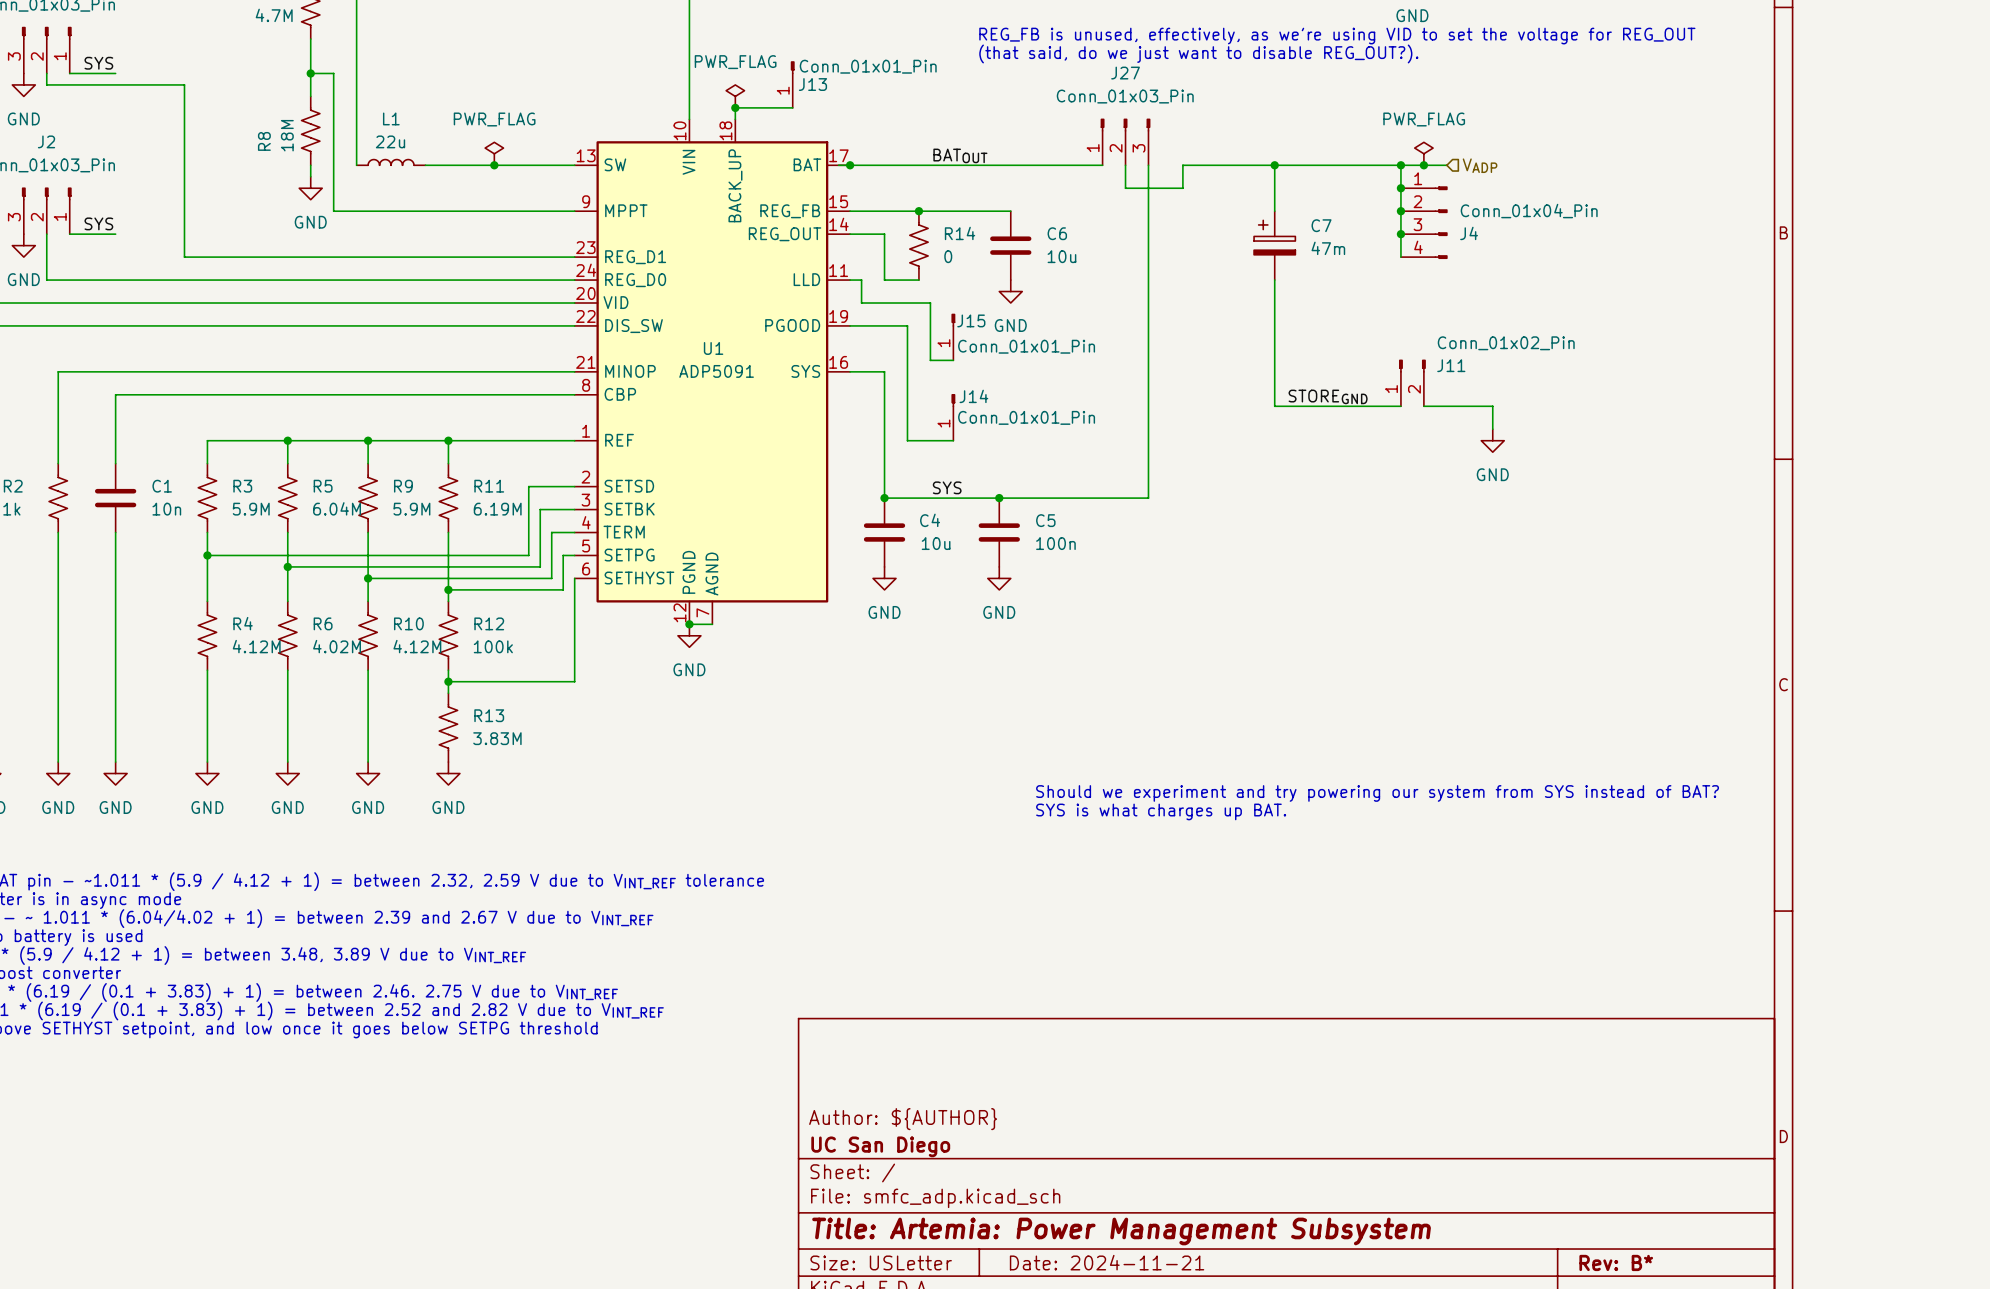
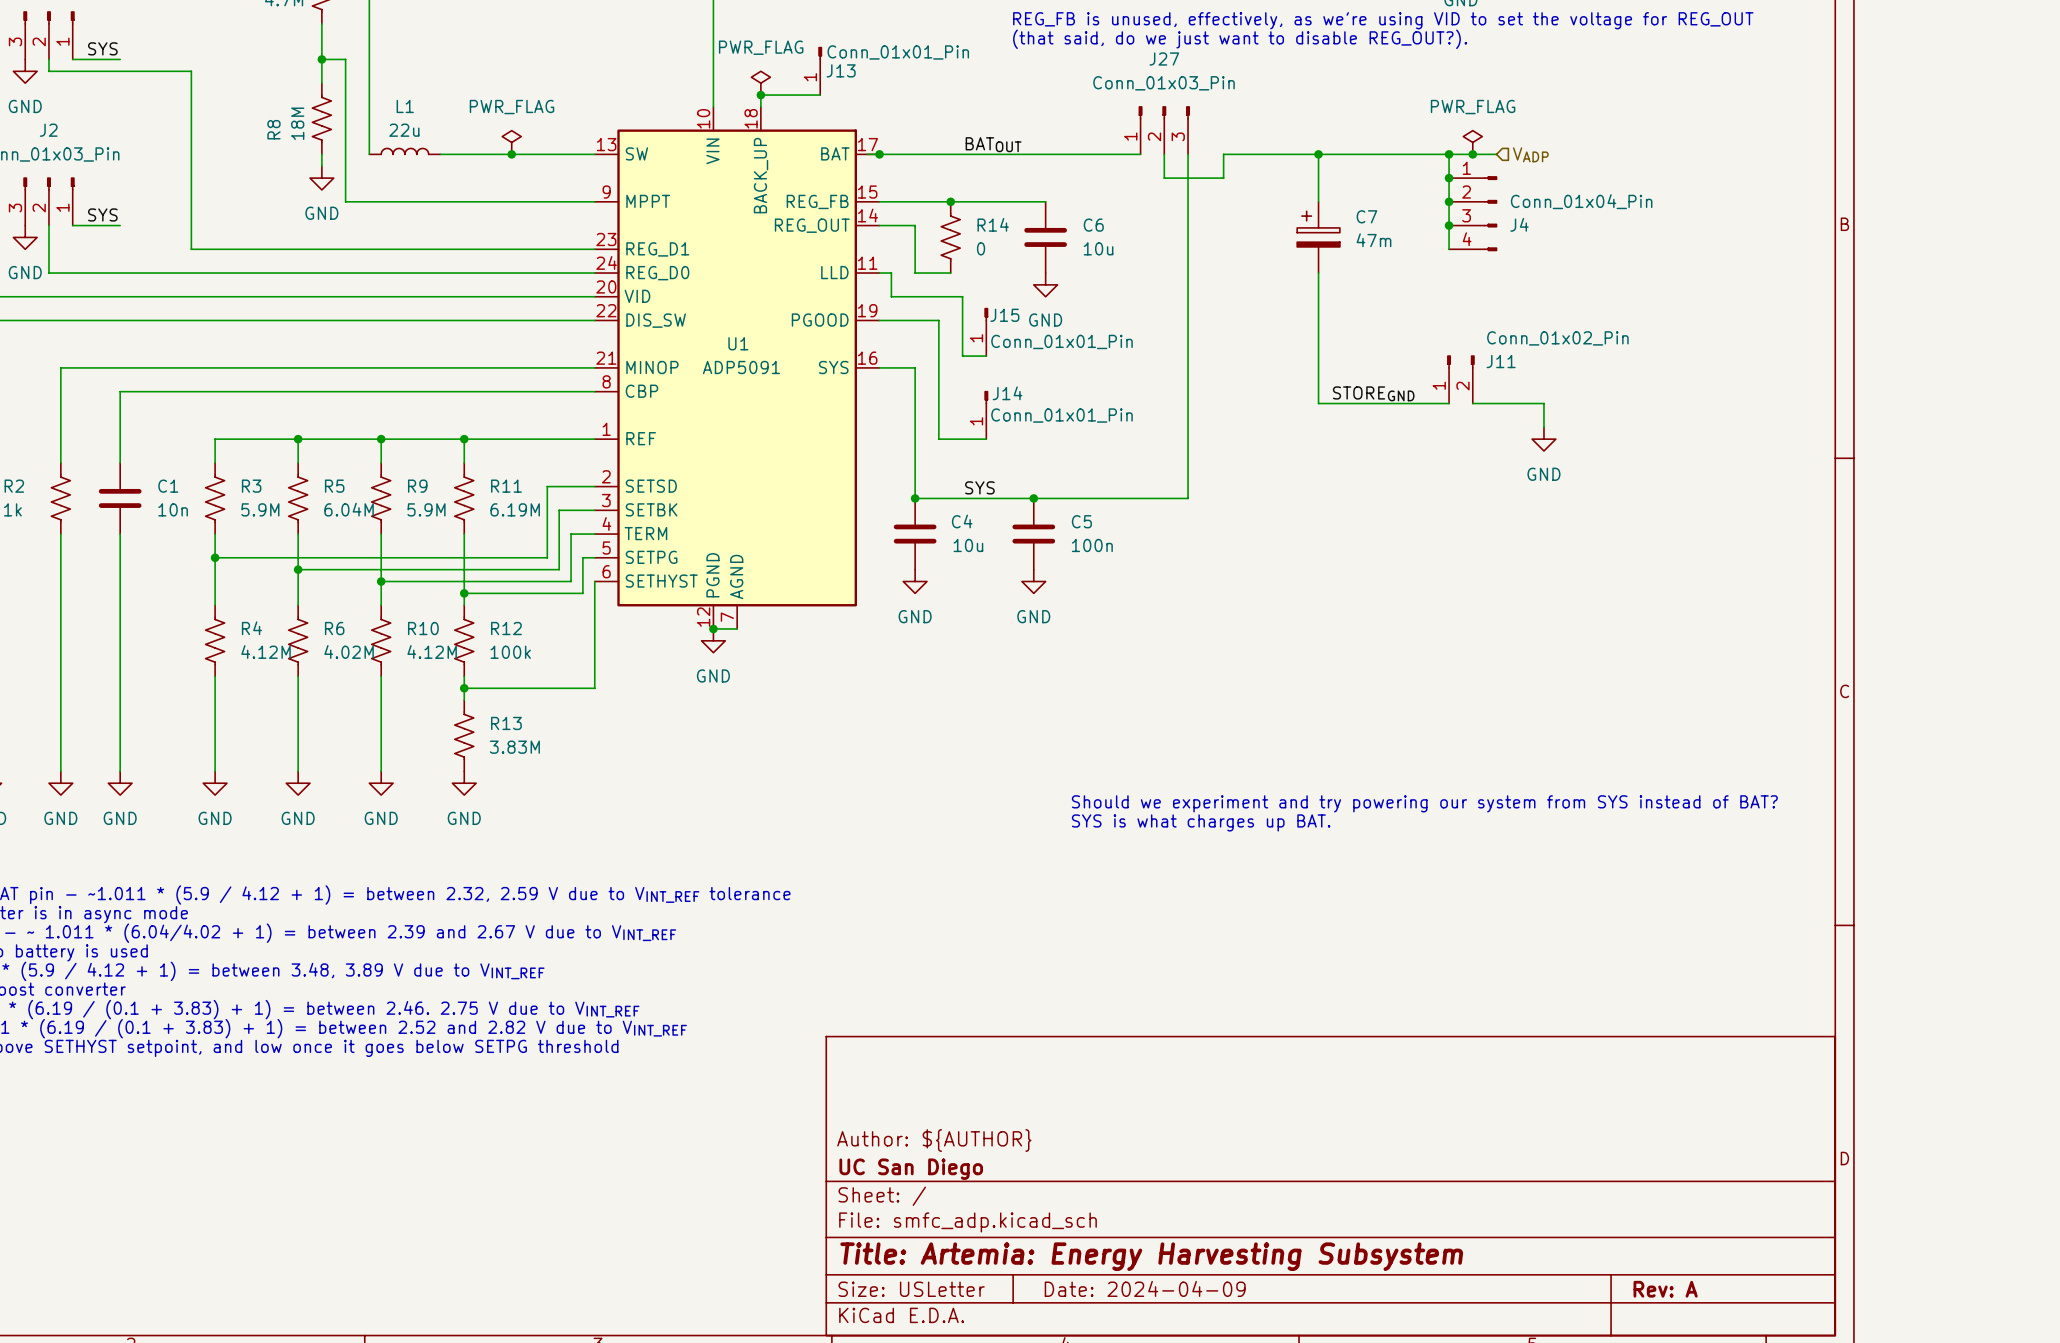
title block: Title: Artemia: Power Management Subsystem (1121, 1231) -> Title: Artemia: Energy Harvesting Subsystem (1151, 1256)
title block: Date: 2024-11-21 (1107, 1262) -> Date: 2024-04-09 (1145, 1288)
title block: Rev: B* (1616, 1262) -> Rev: A (1665, 1289)

